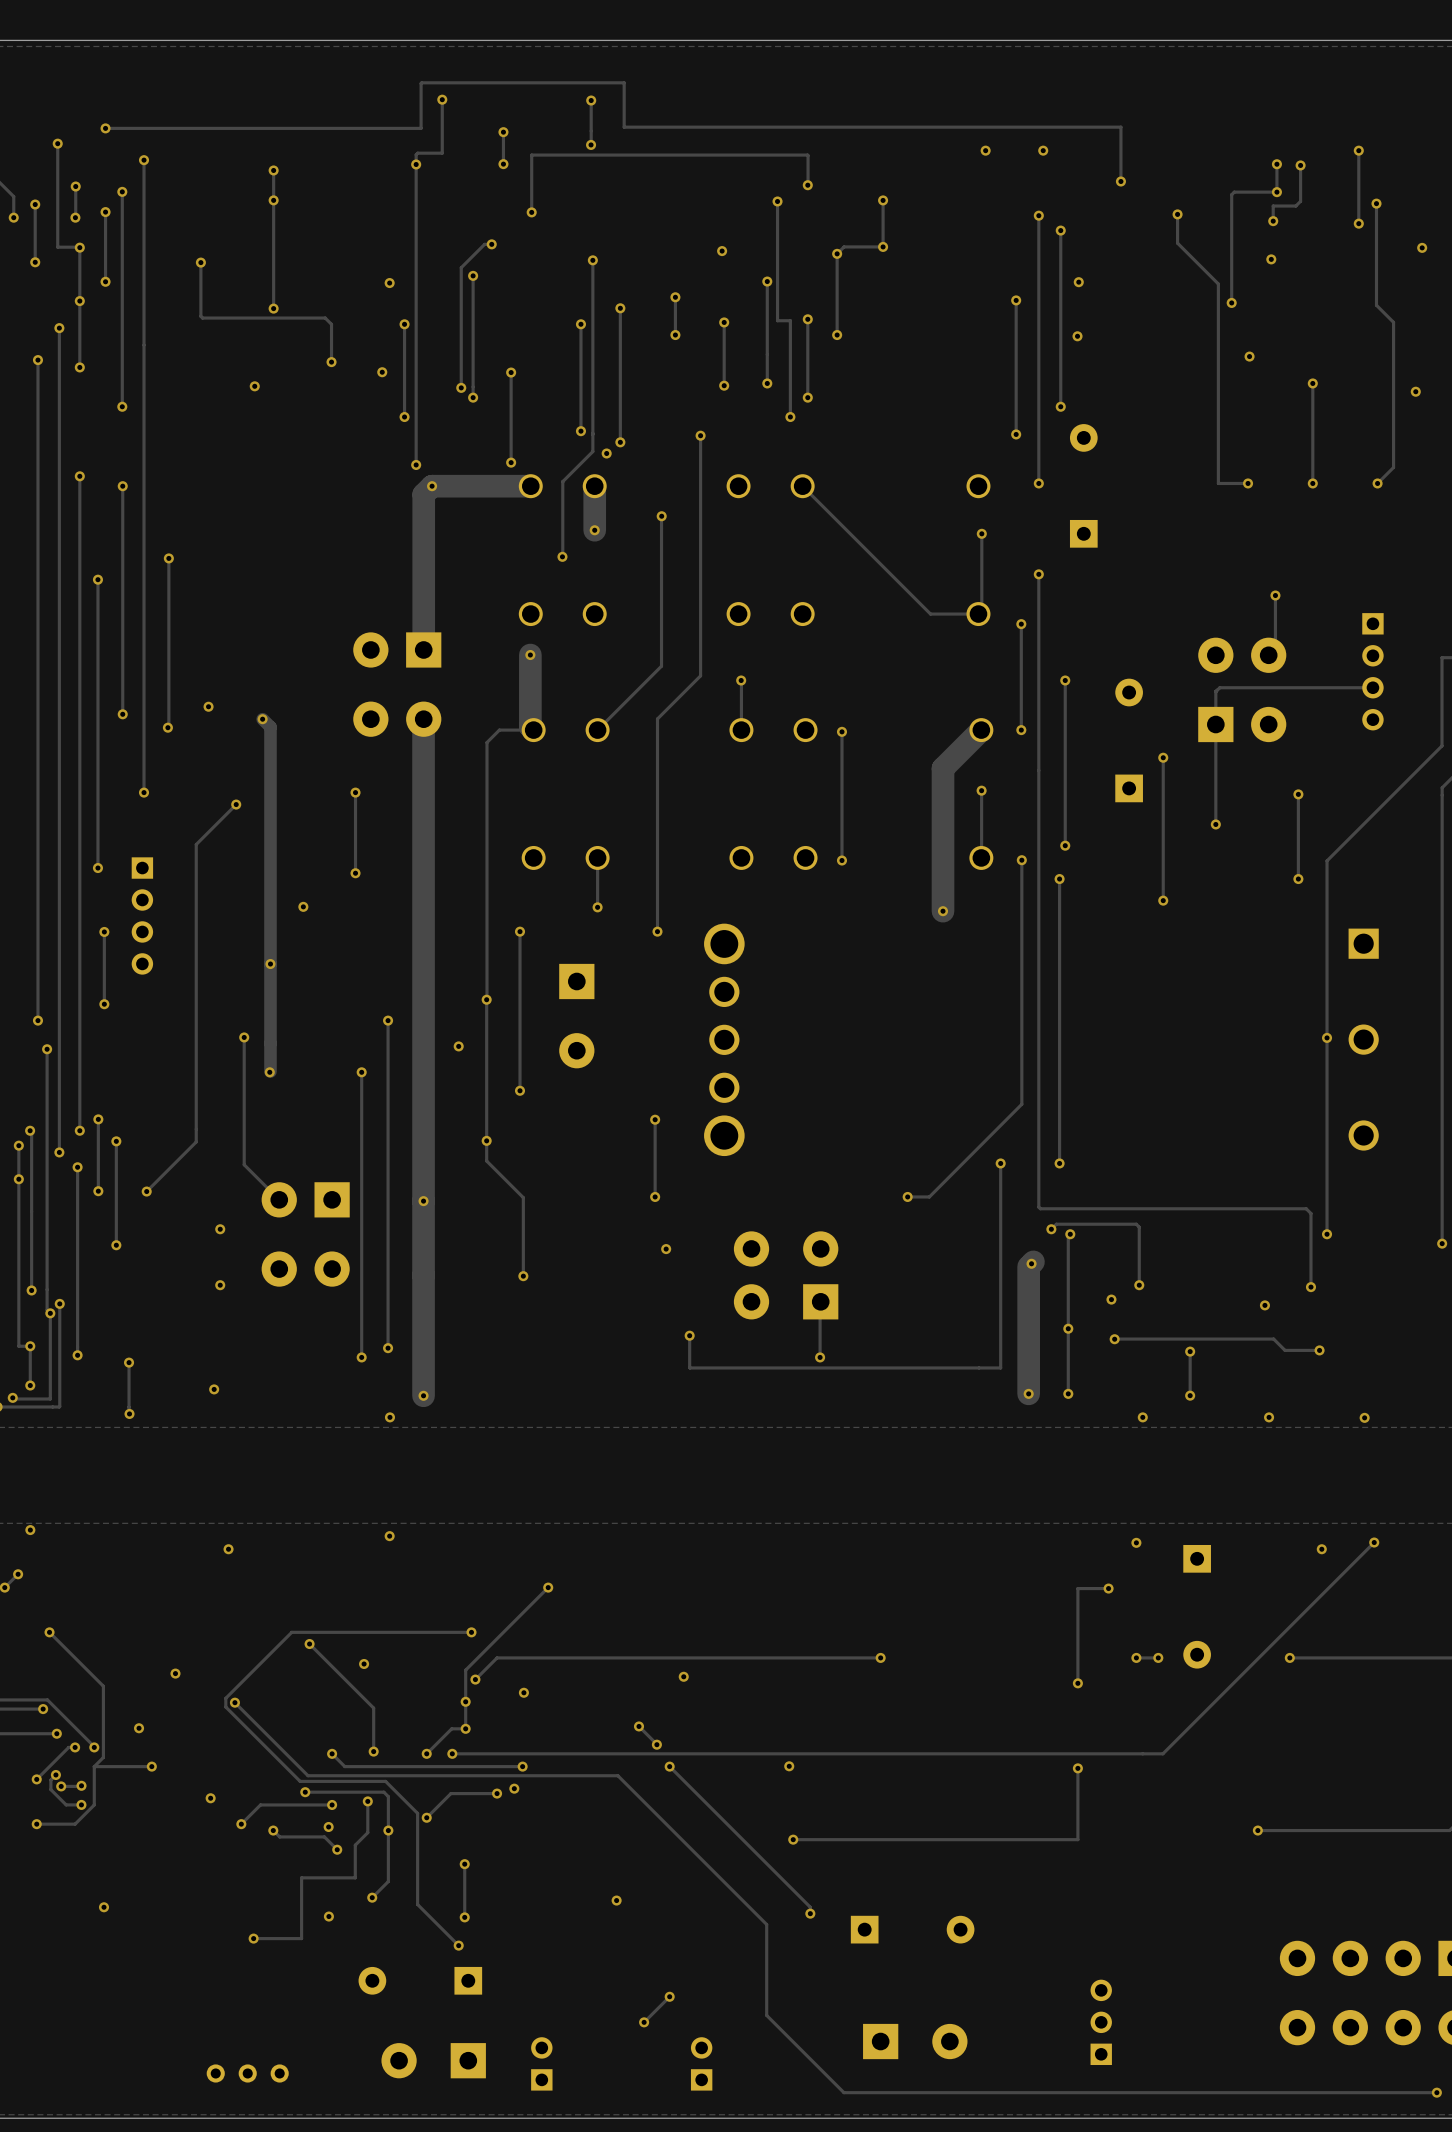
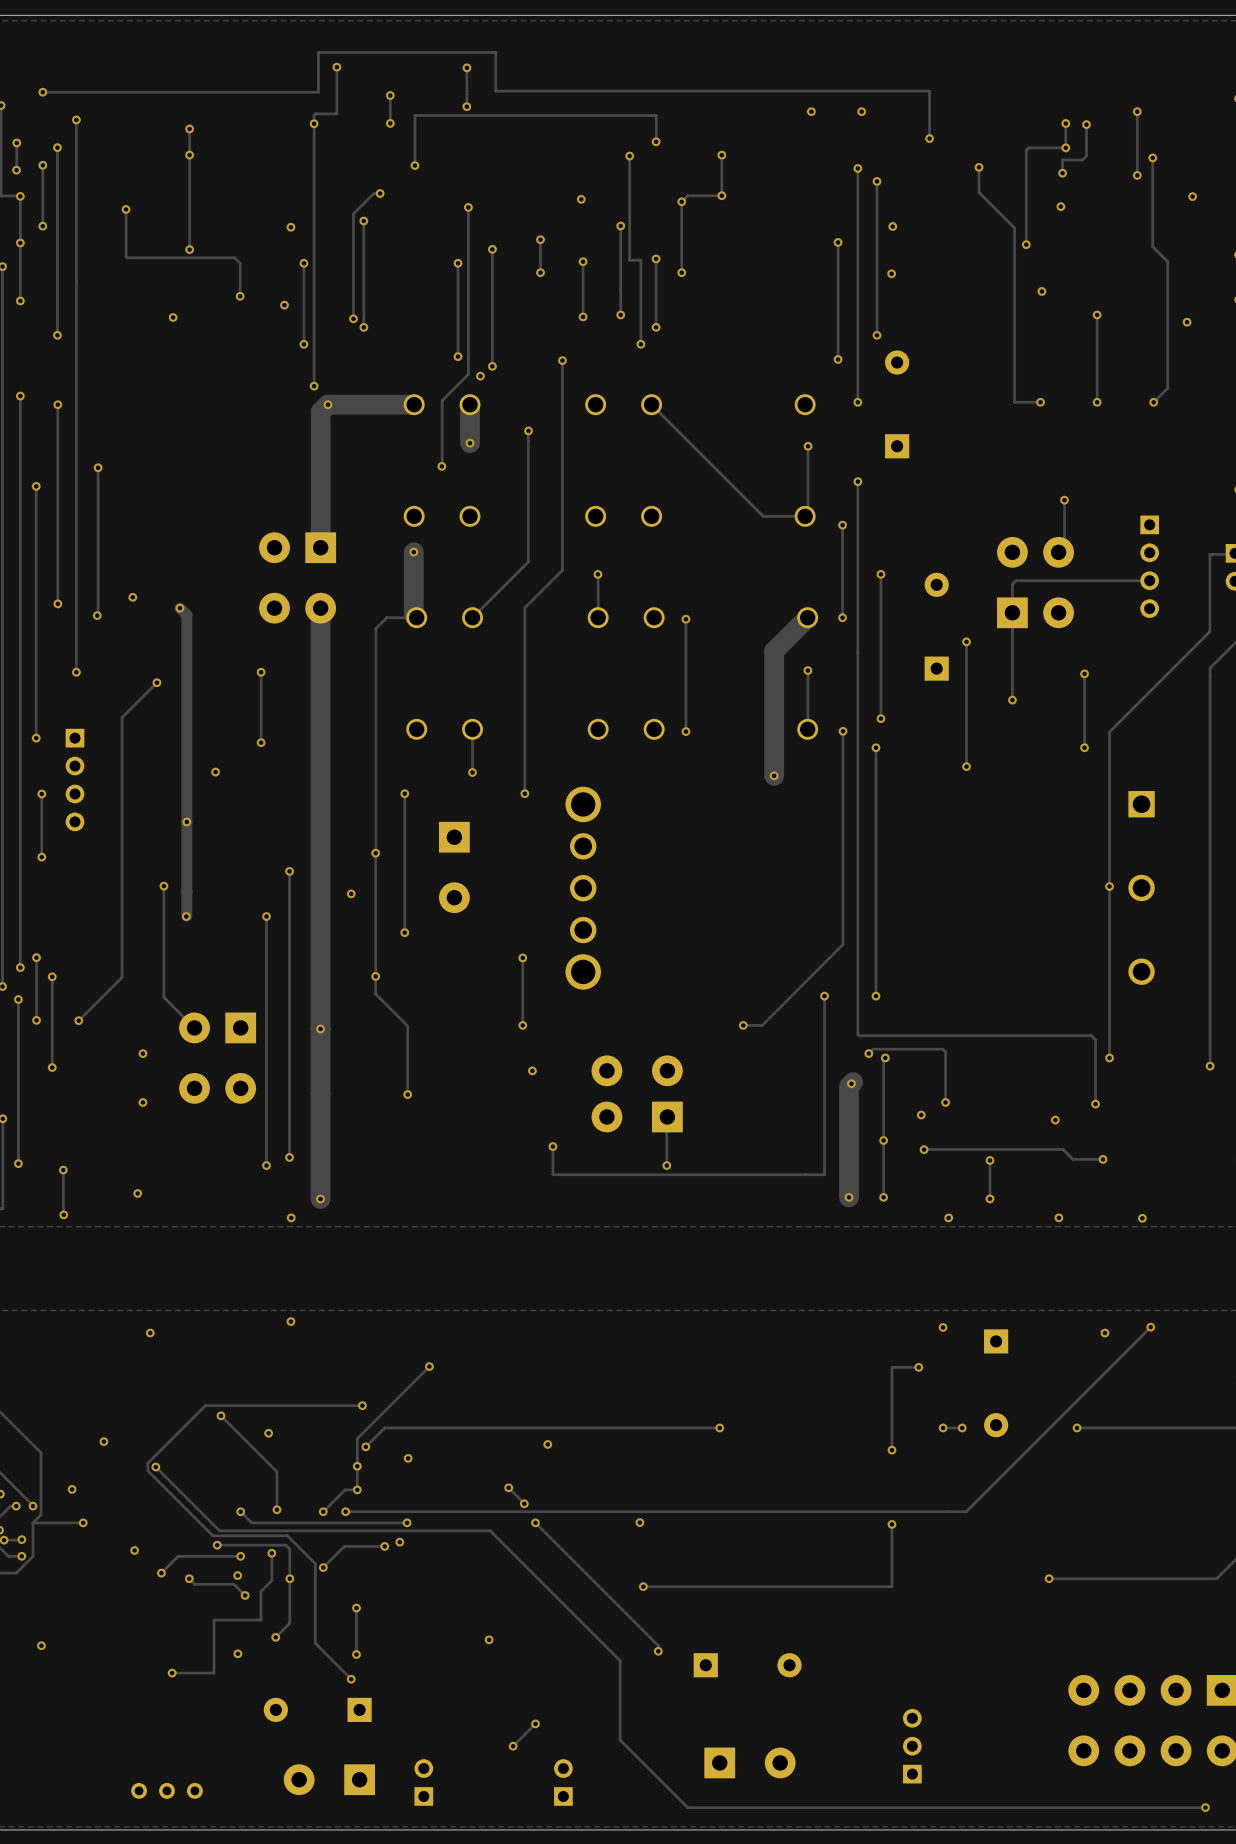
track: (511, 372) (511, 462) -> none
via: (511, 372) -> none
via: (511, 462) -> none

